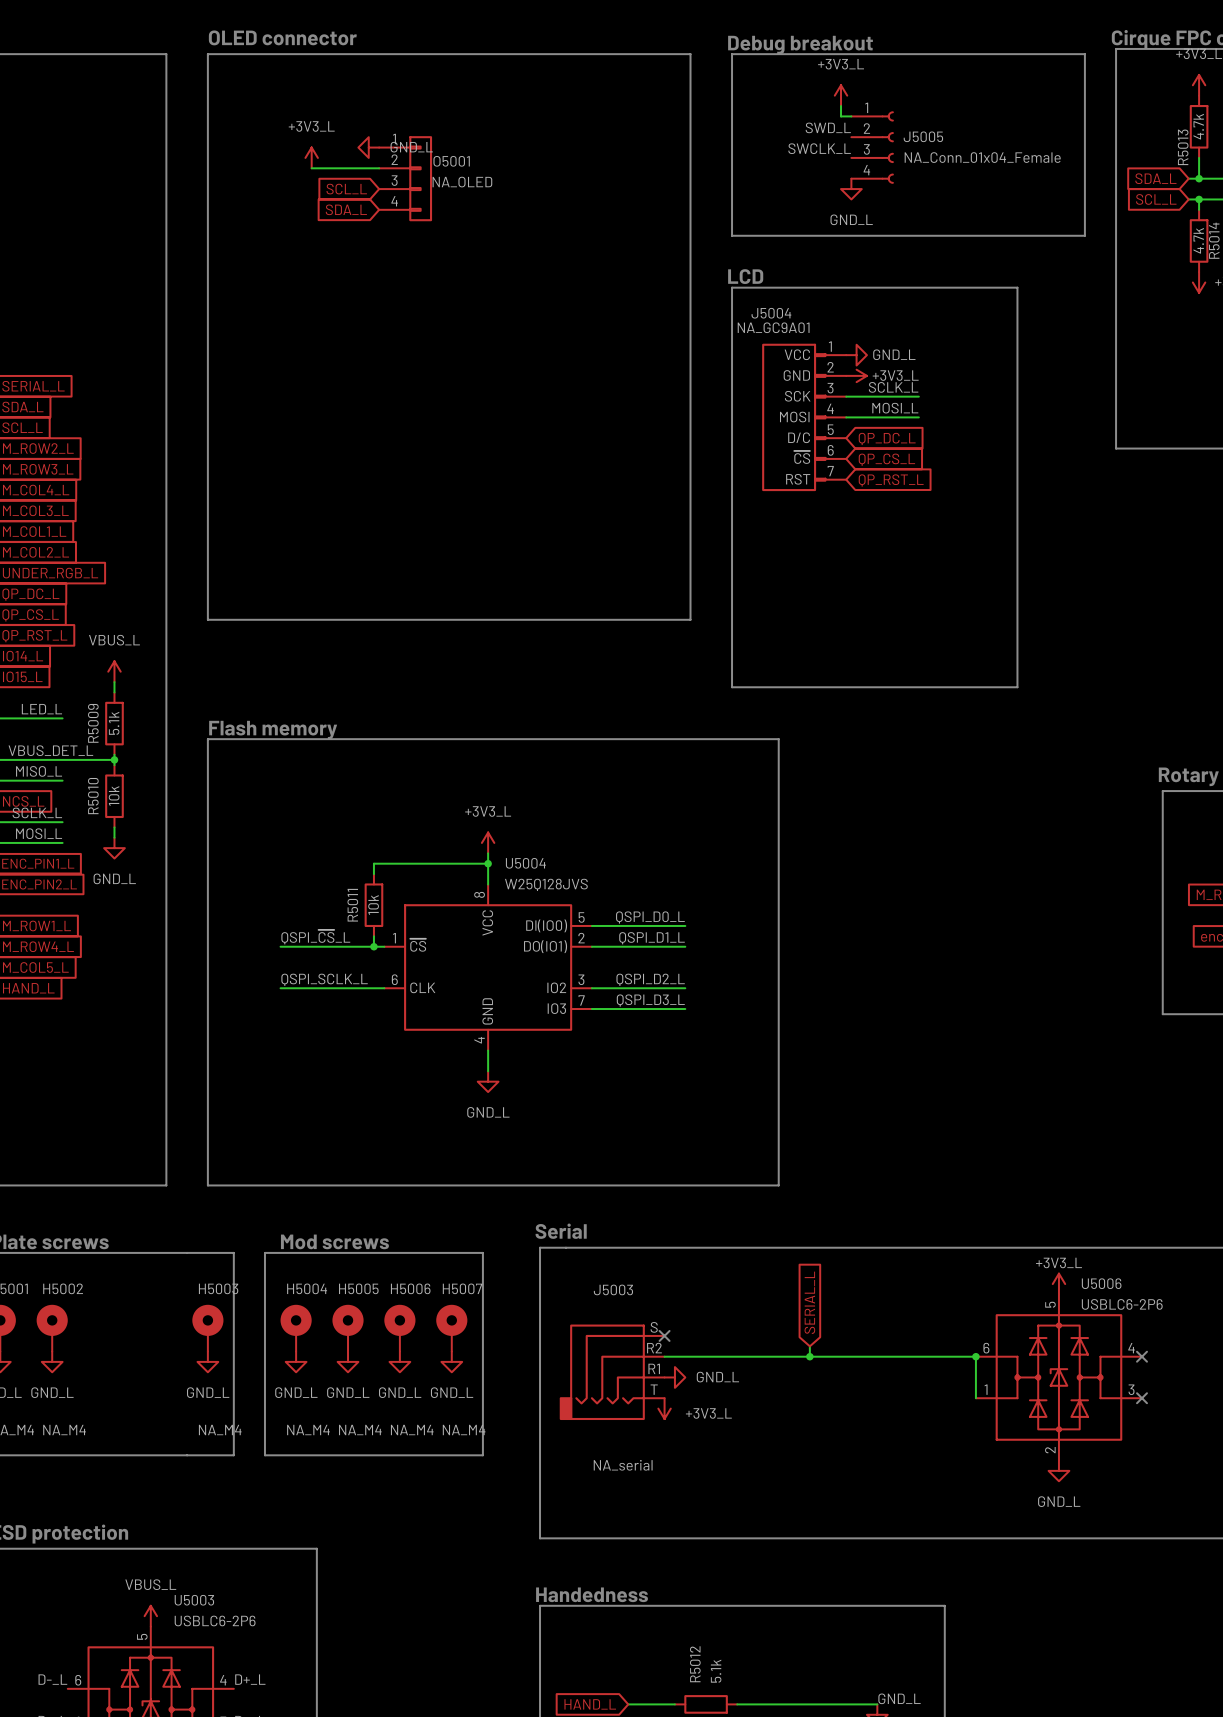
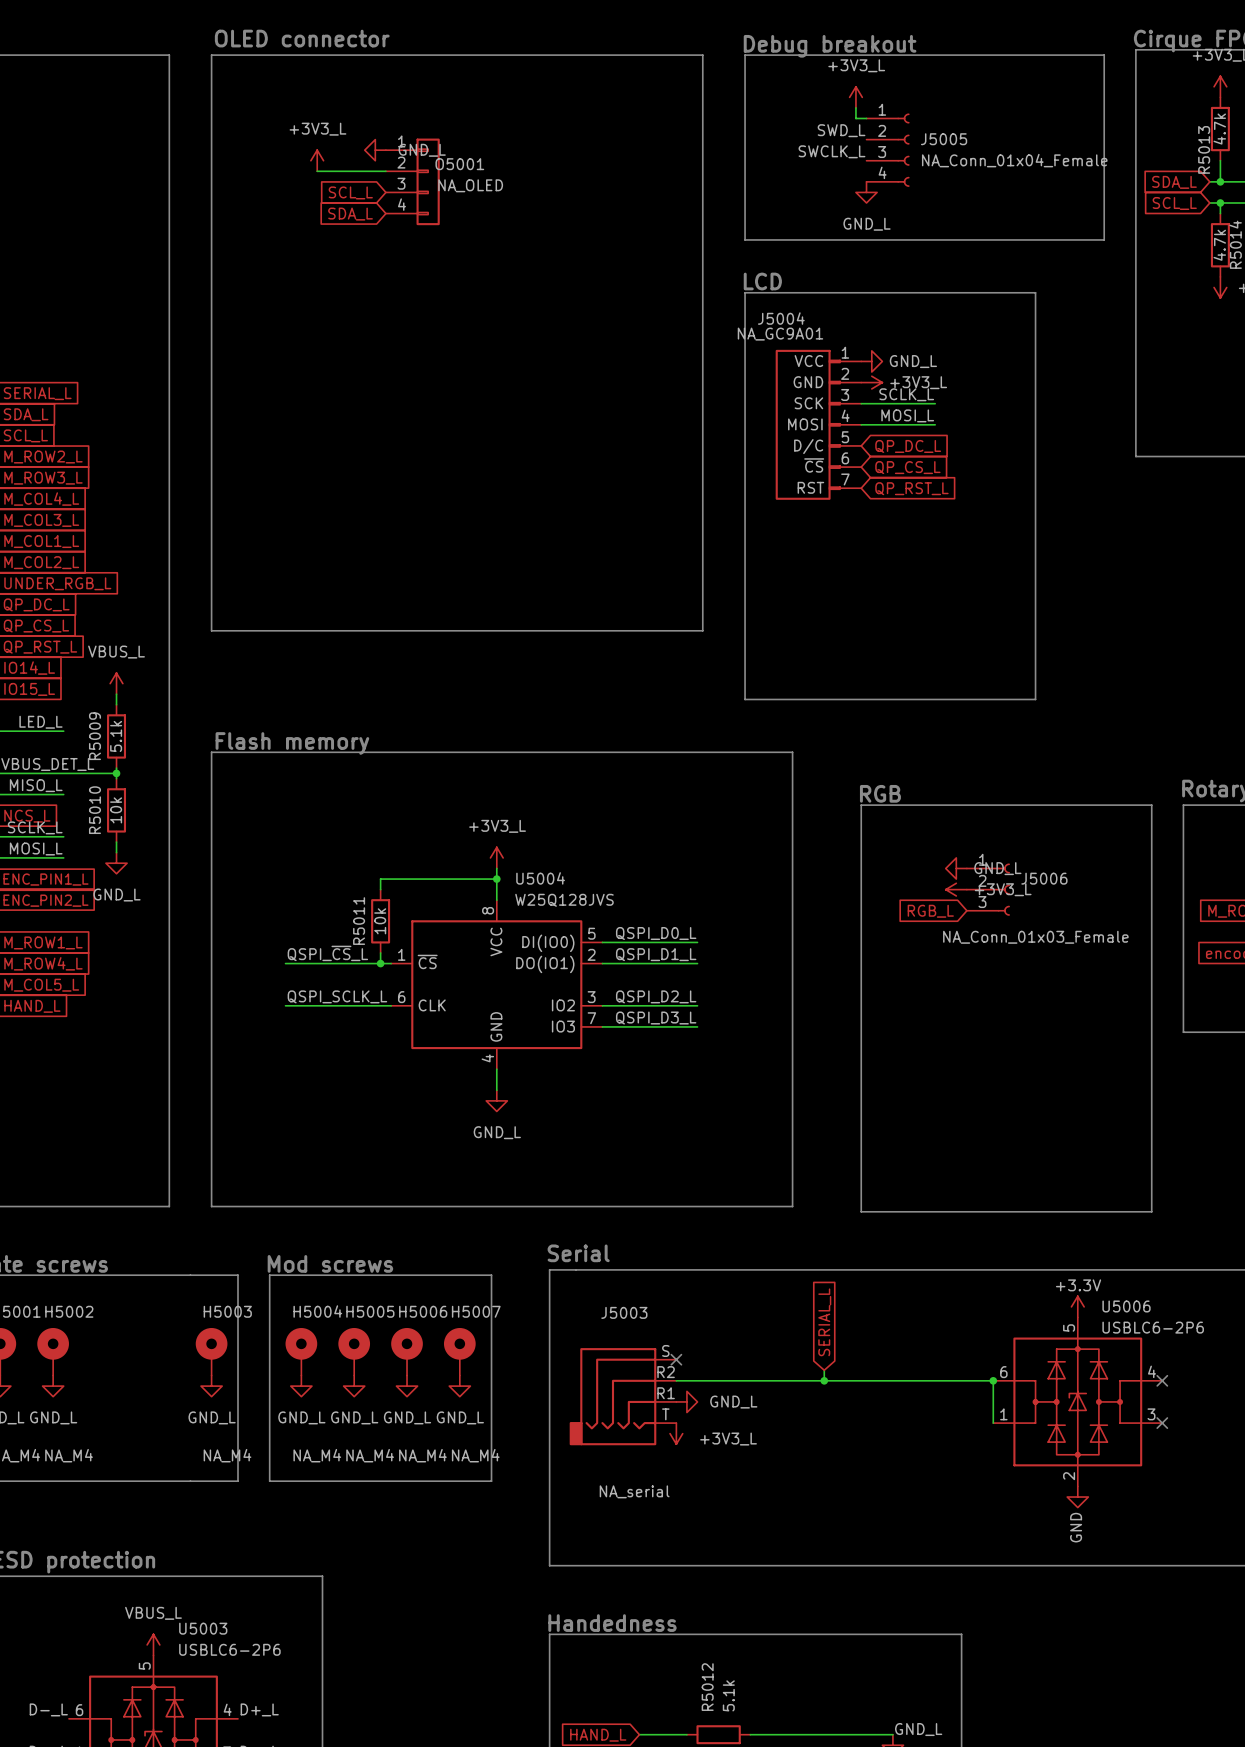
text: none -> RGB (880, 793)
line: none -> (861, 805) (861, 1211) (1151, 1211) (1151, 805) (861, 805)
power symbol: none -> GND_L (956, 868)
power symbol: none -> +3V3_L (956, 889)
J5006: none -> NA_Conn_01x03_Female (988, 889)
global label: none -> RGB_L (930, 911)
power symbol: +3V3_L (1058, 1284) -> +3.3V (1077, 1306)
power symbol: GND_L (1058, 1470) -> GND (1077, 1497)

